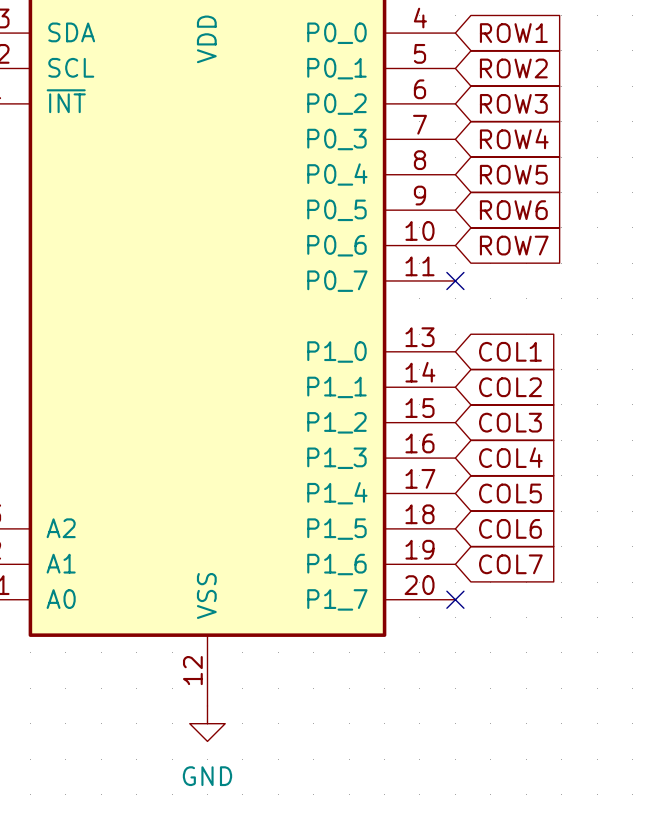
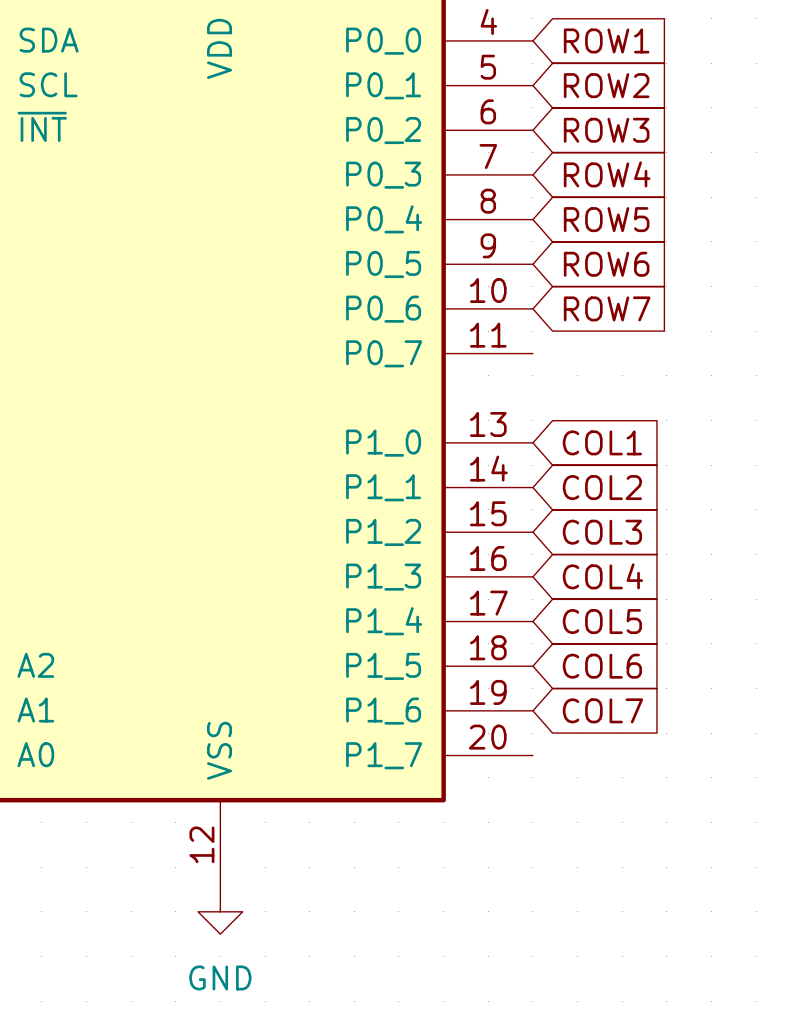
no-connect mark: (455, 280) -> none
no-connect mark: (455, 599) -> none

